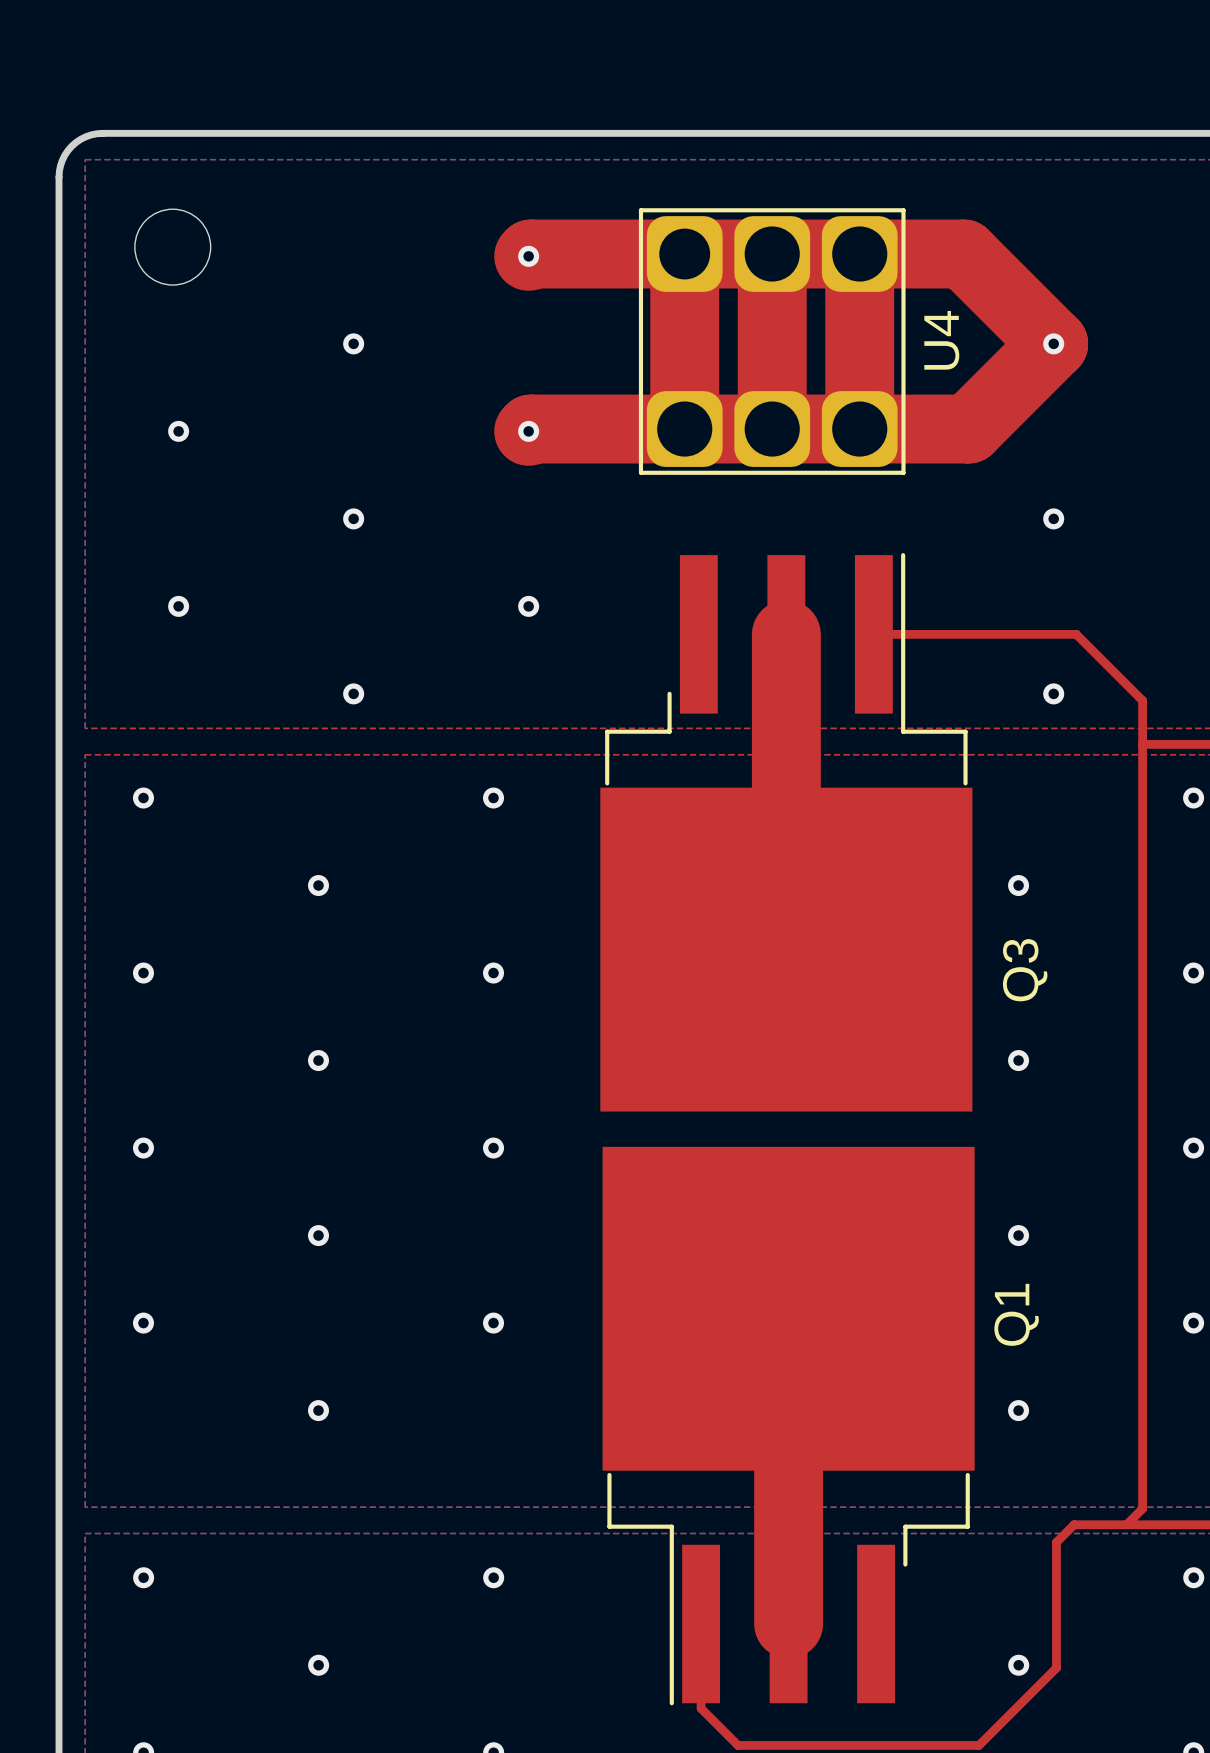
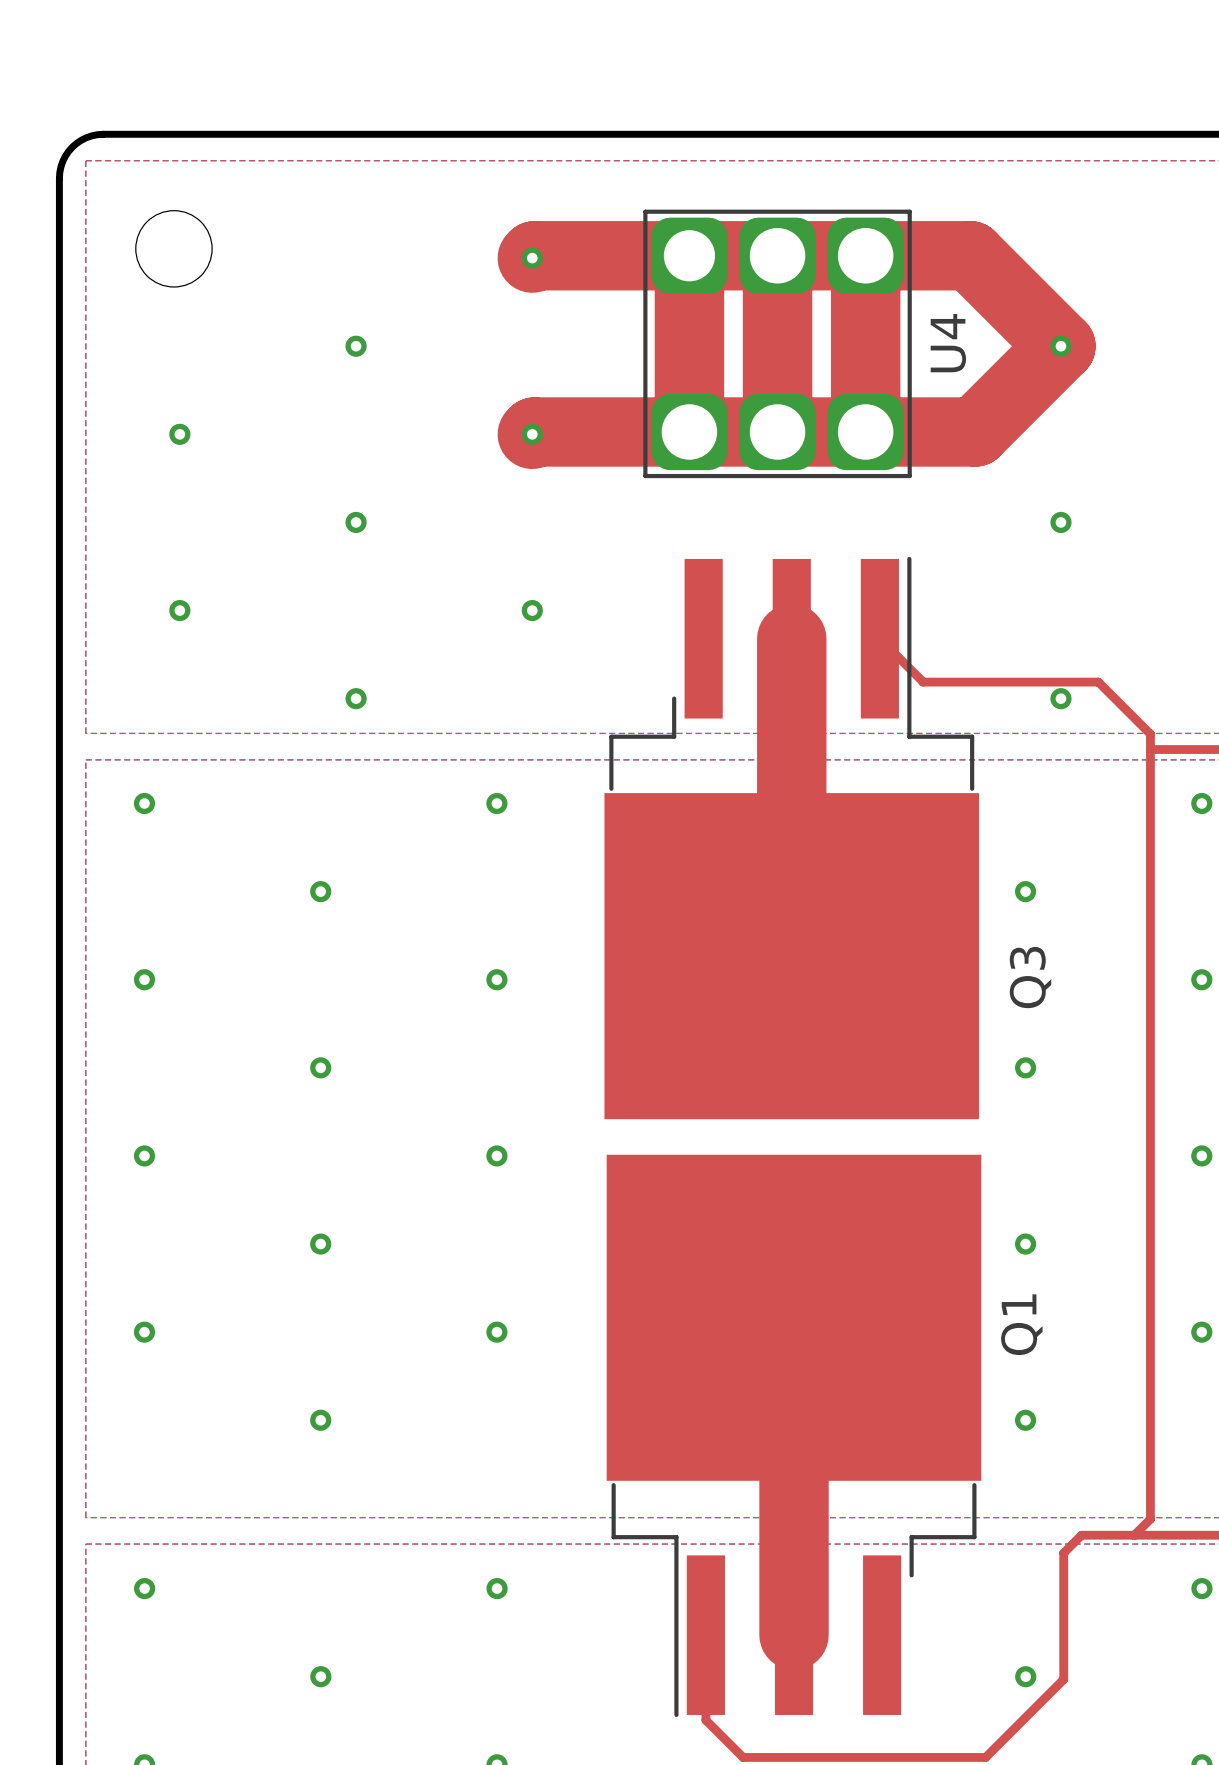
top track: (873, 634) (1076, 634) (1142, 700) (1142, 729) -> (879, 638) (923, 682) (1098, 682) (1150, 734)

